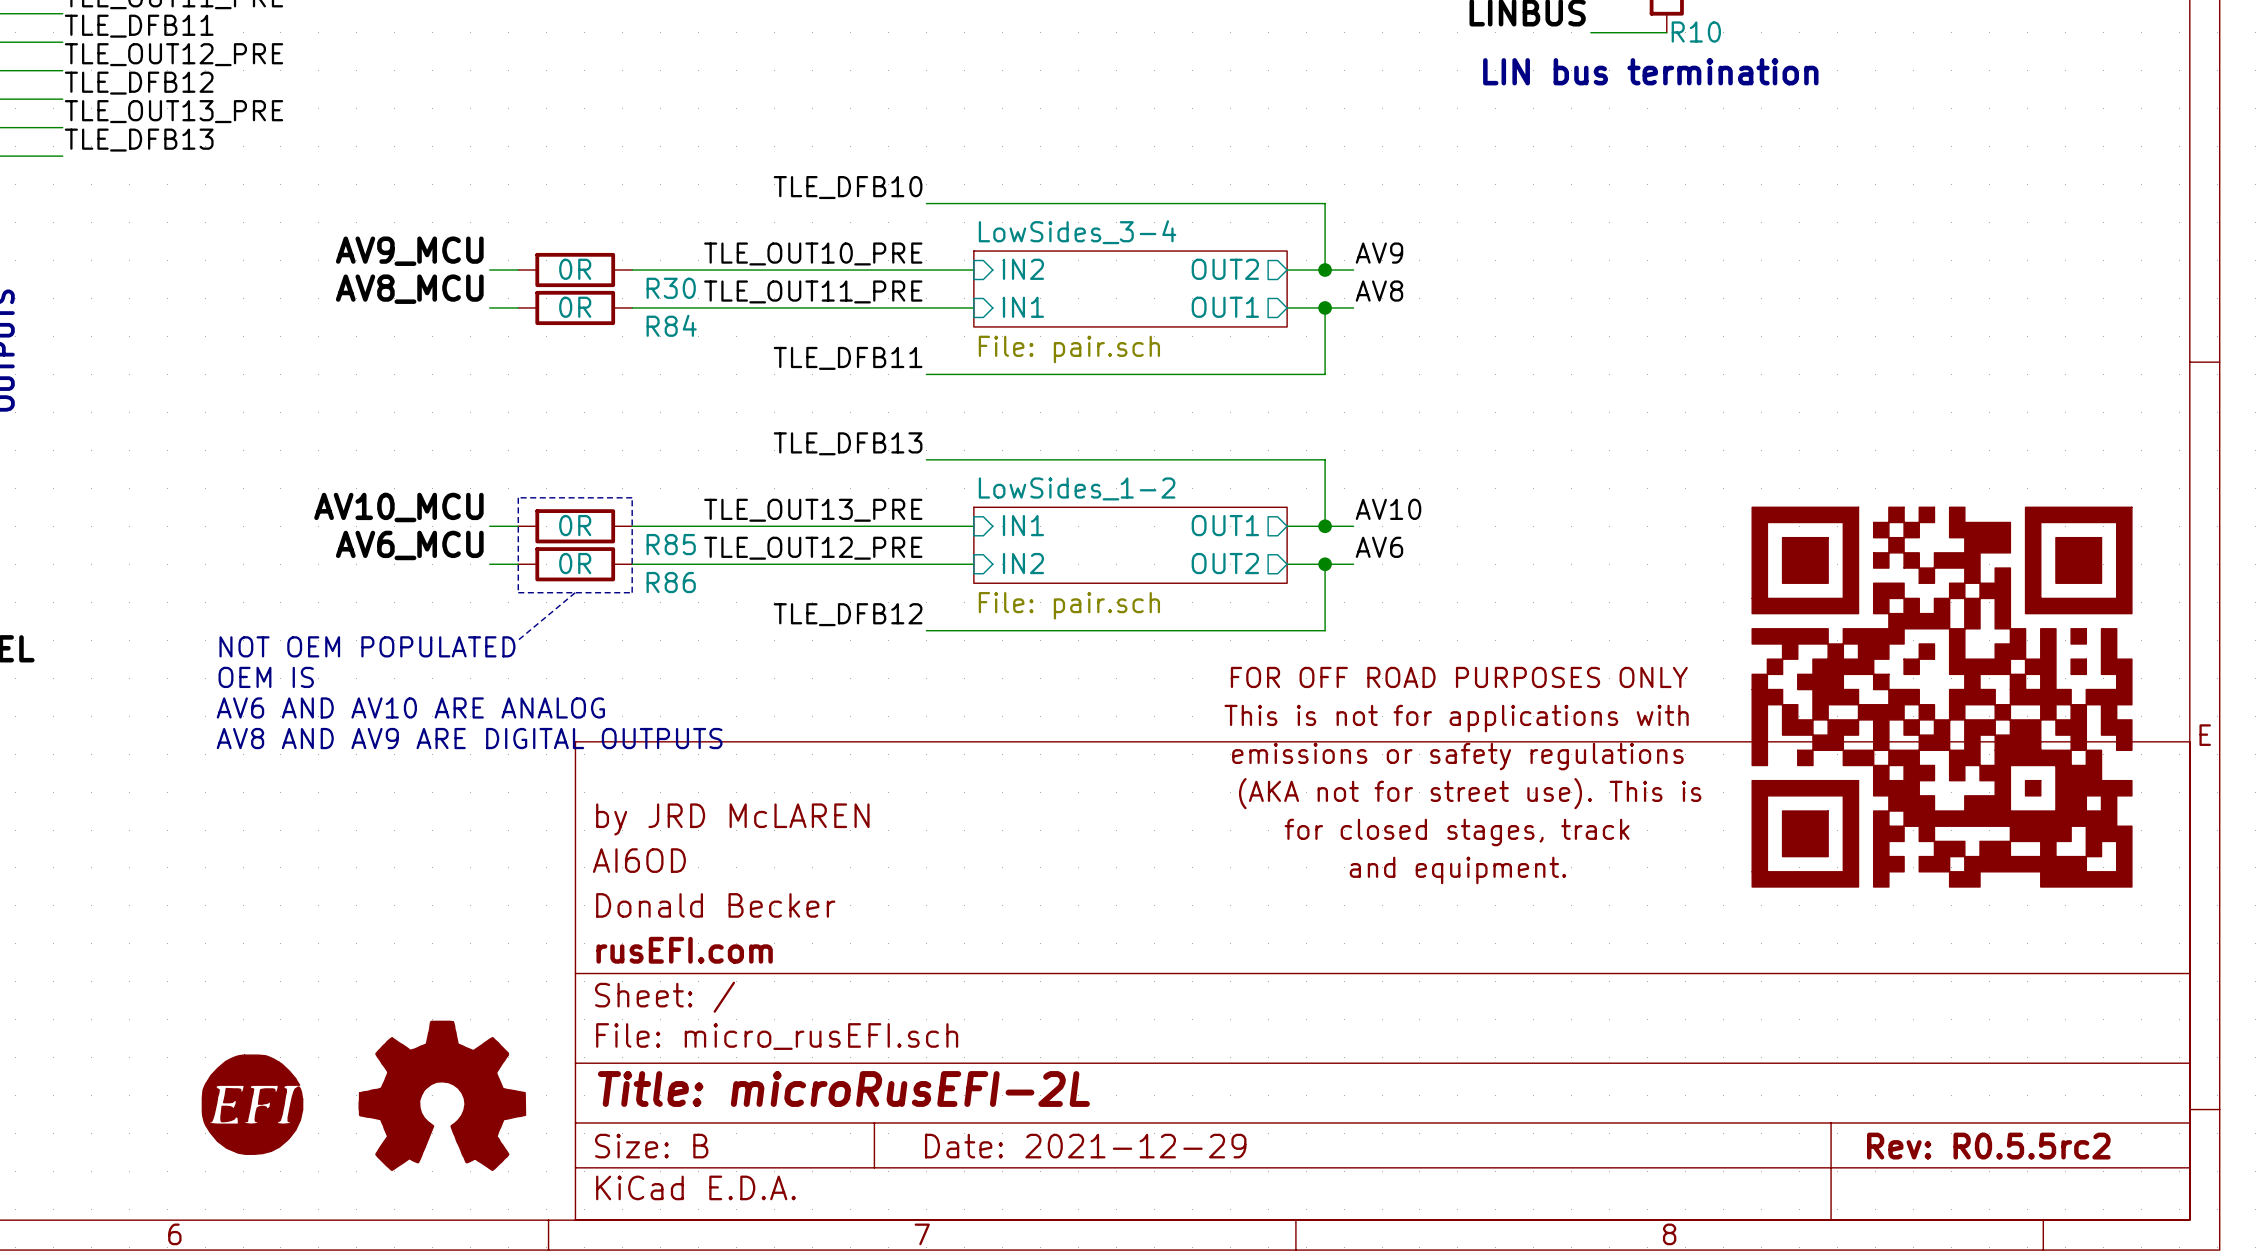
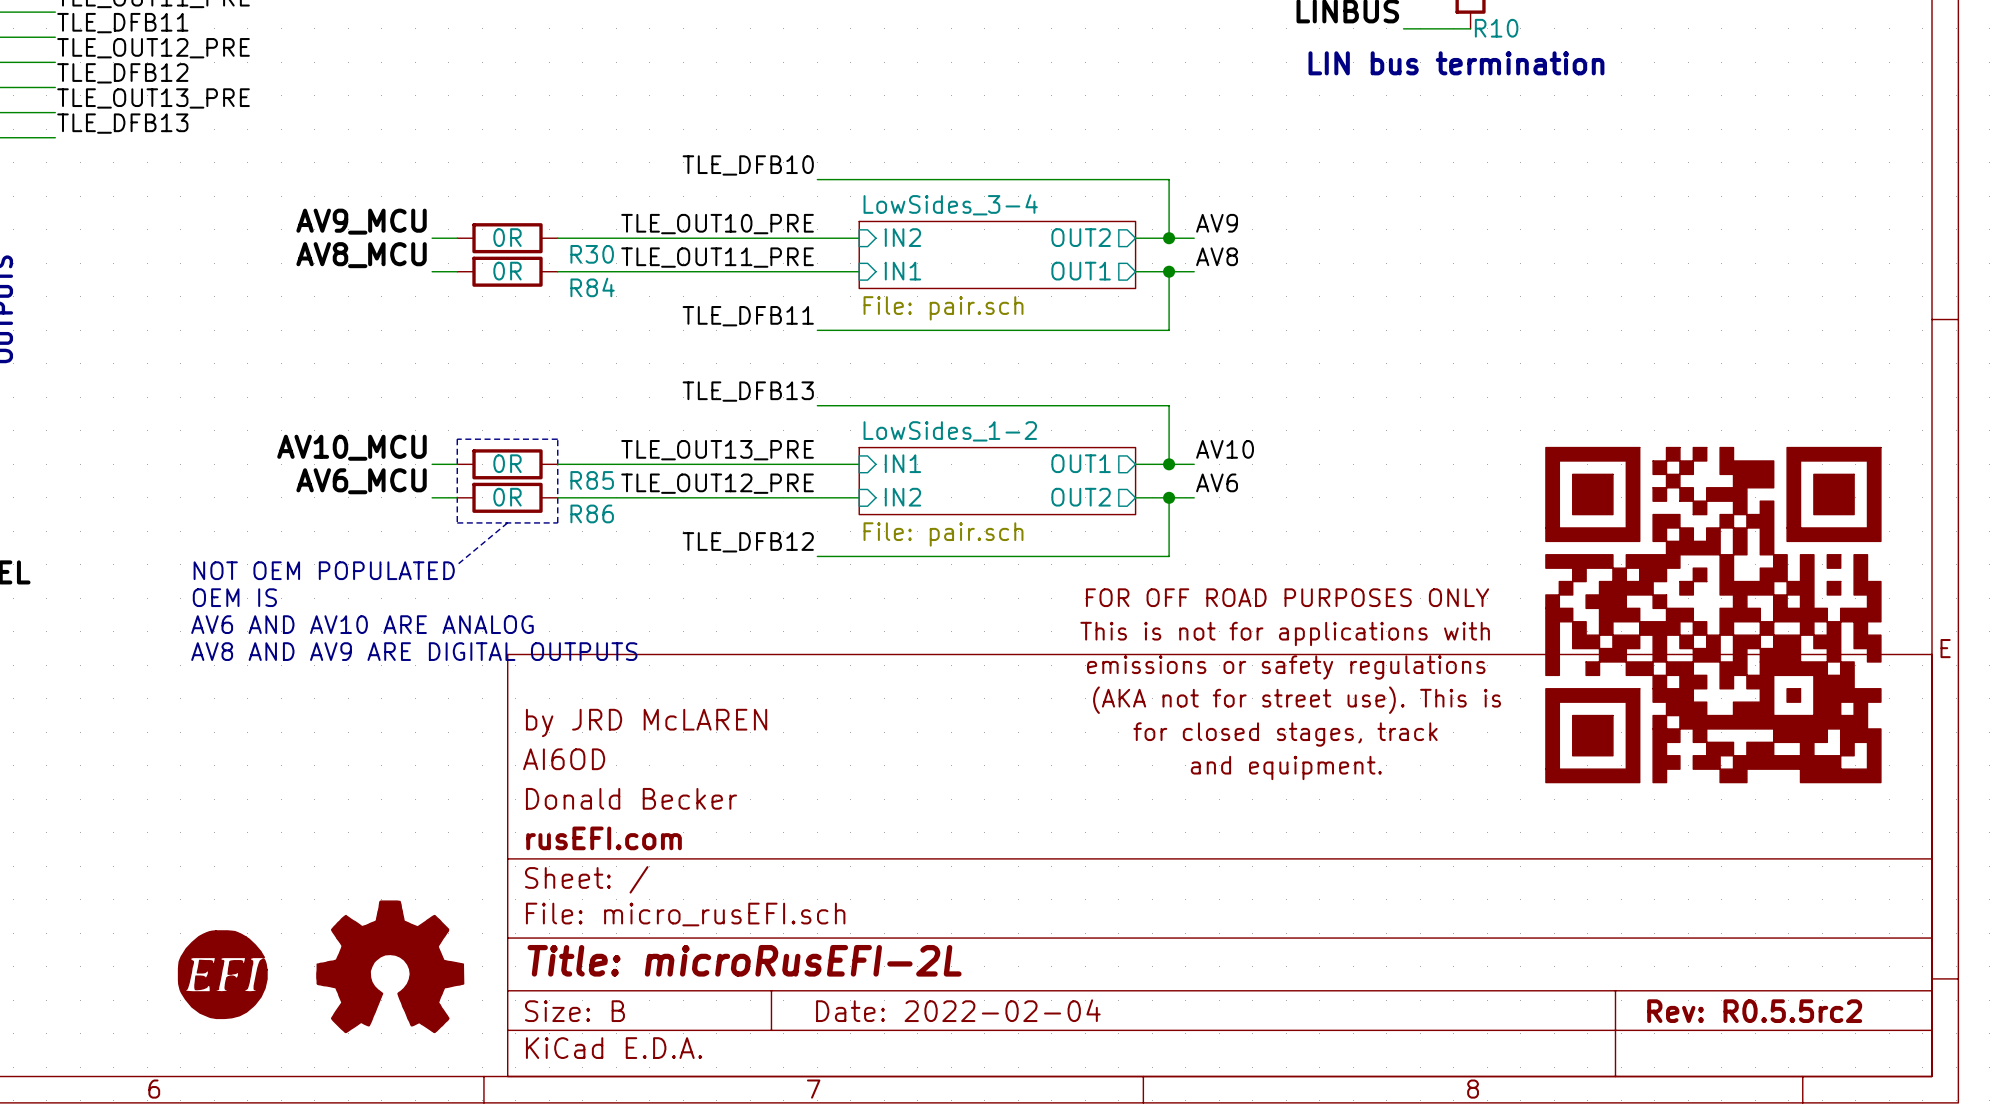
title block: Date: 2021-12-29 (1085, 1146) -> Date: 2022-02-04 (958, 1010)

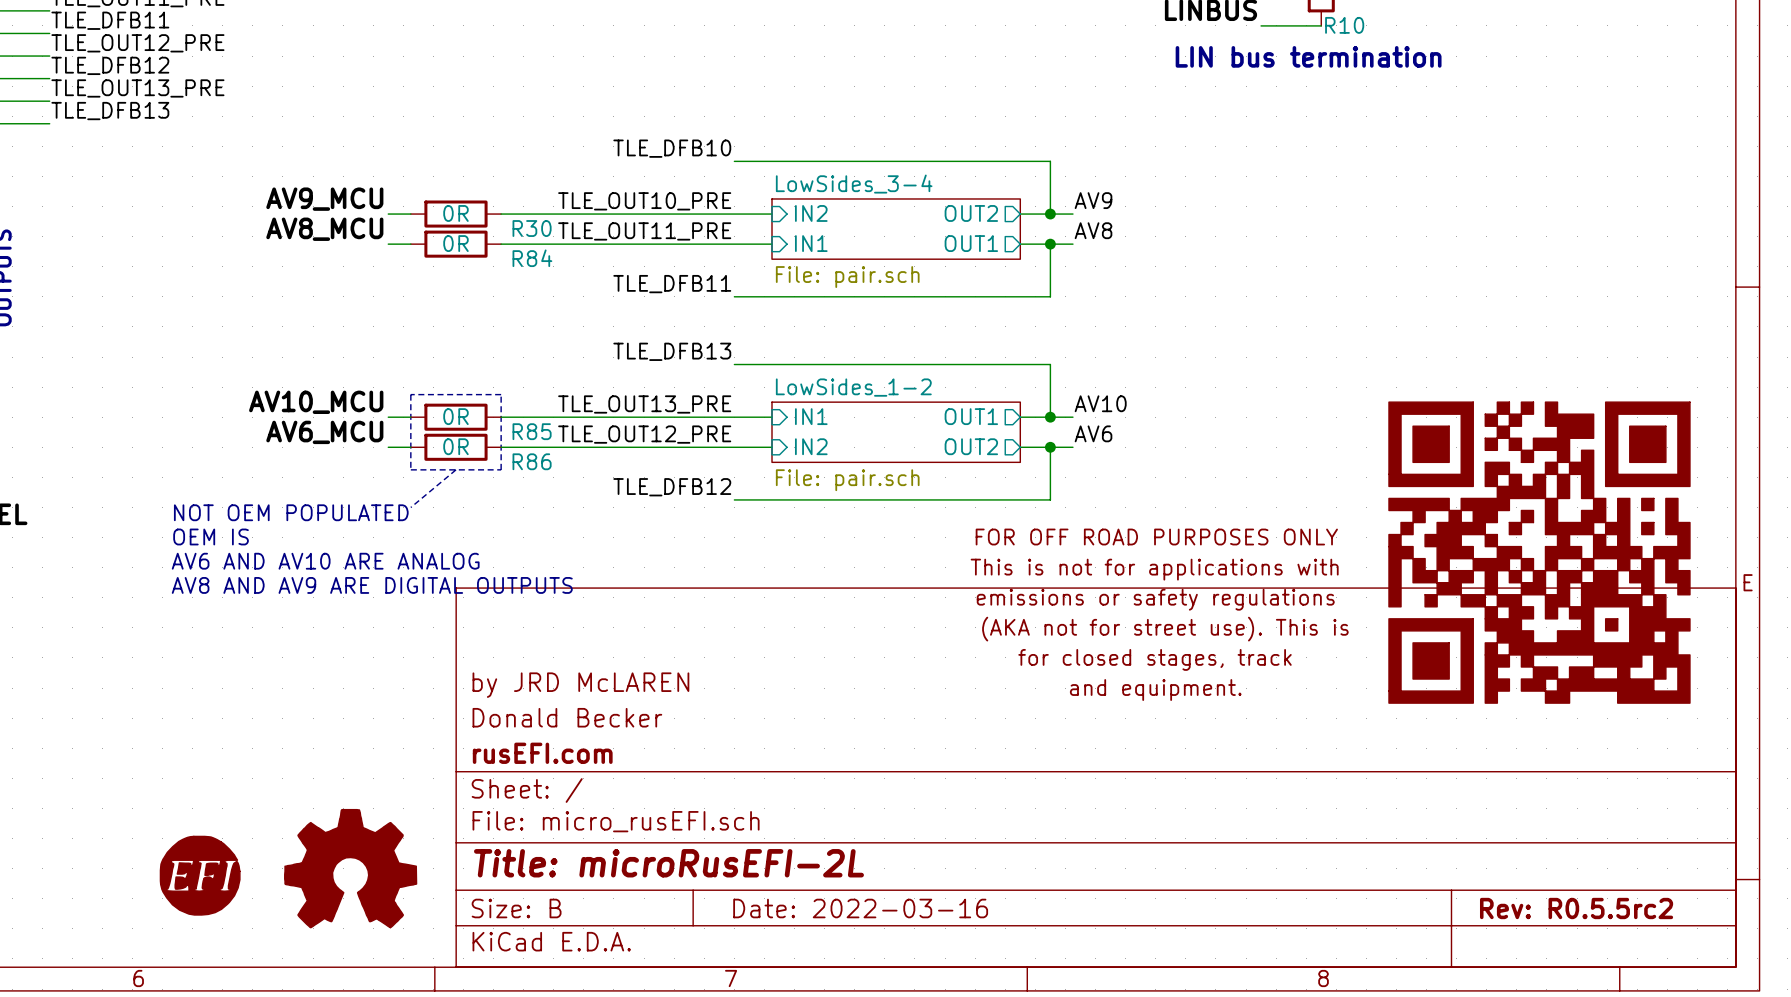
title block: by JRD McLAREN (646, 722) -> none
title block: AI6OD (564, 759) -> by JRD McLAREN (580, 685)
title block: Date: 2022-02-04 (958, 1010) -> Date: 2022-03-16 (860, 908)

